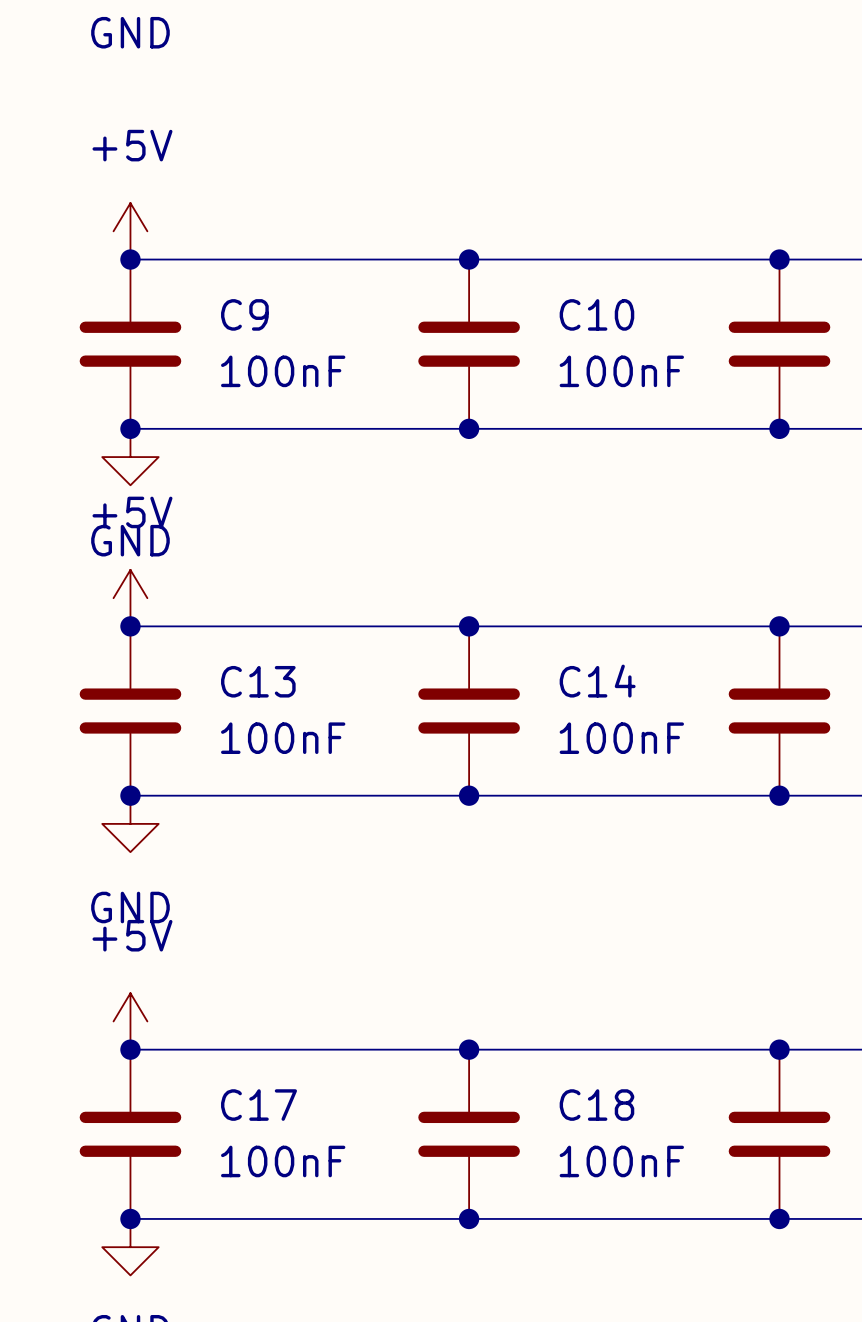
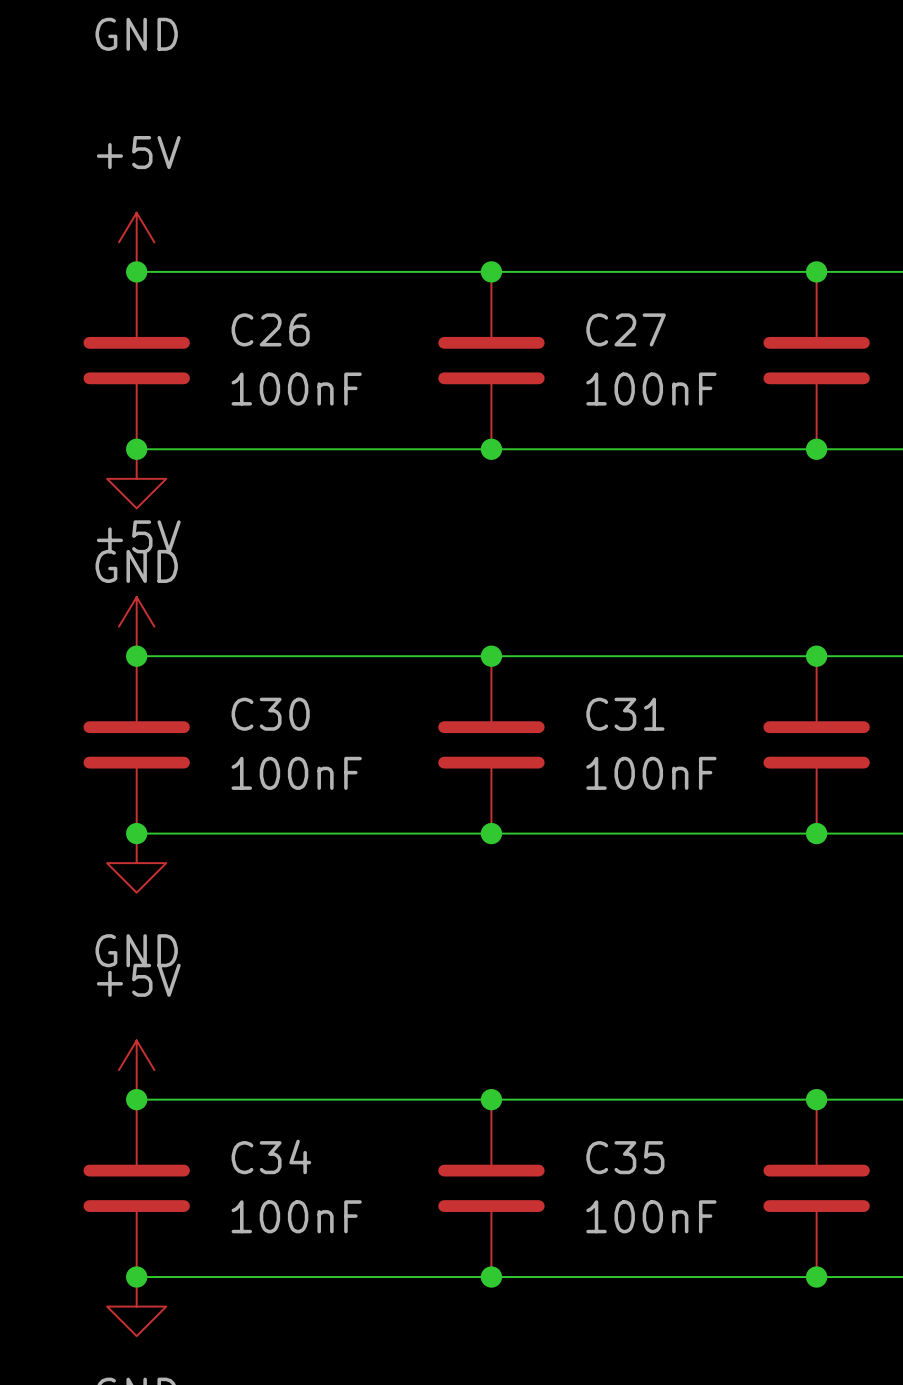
C9 name: C9 (244, 314) -> C26 (270, 329)
C10 name: C10 (596, 314) -> C27 (626, 329)
C13 name: C13 (258, 681) -> C30 (270, 714)
C14 name: C14 (597, 681) -> C31 (625, 714)
C17 name: C17 (259, 1105) -> C34 (271, 1156)
C18 name: C18 (596, 1105) -> C35 (625, 1157)

